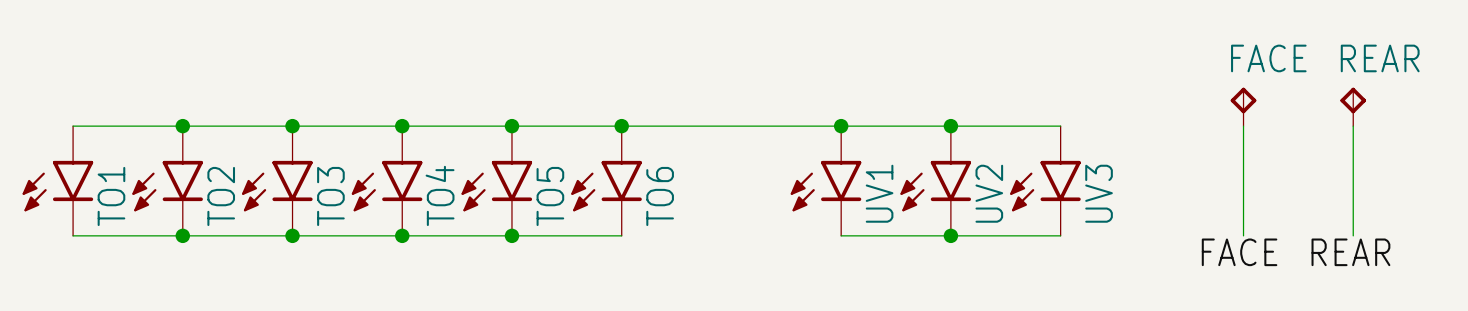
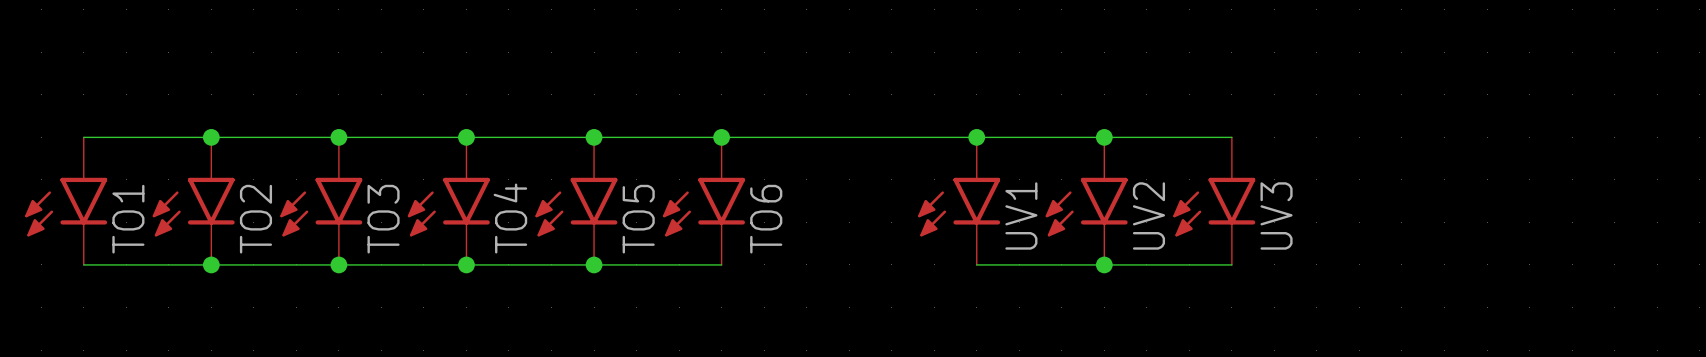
FACE: (1243, 106) -> none
REAR: (1353, 106) -> none
wire: (1243, 126) (1243, 235) -> none
wire: (1353, 126) (1353, 235) -> none
label: FACE (1239, 252) -> none
label: REAR (1350, 252) -> none

